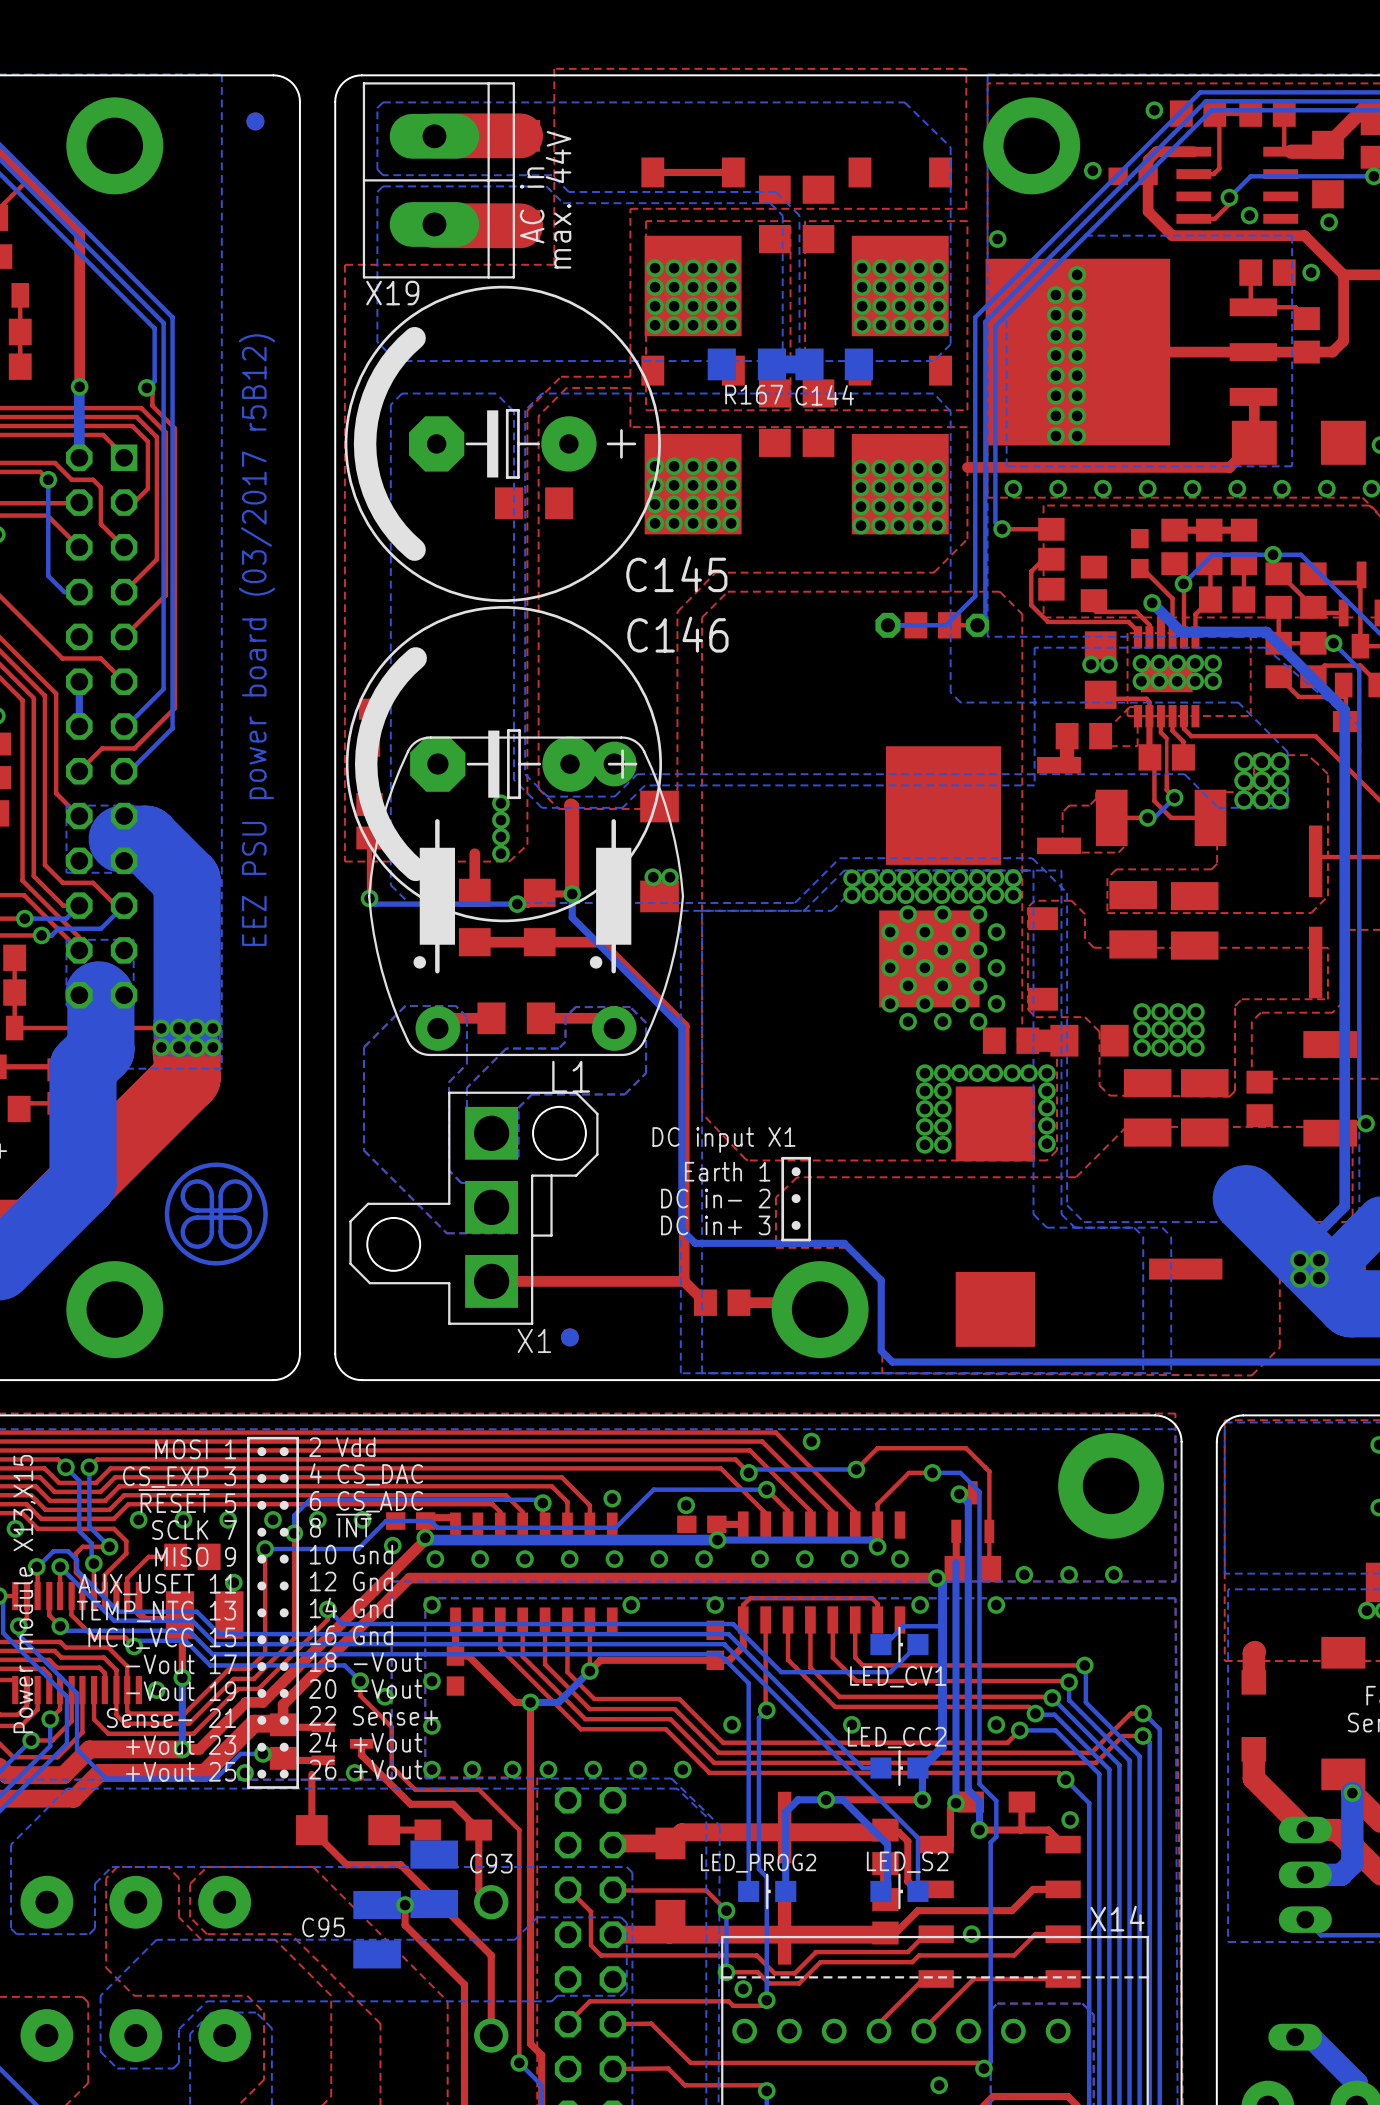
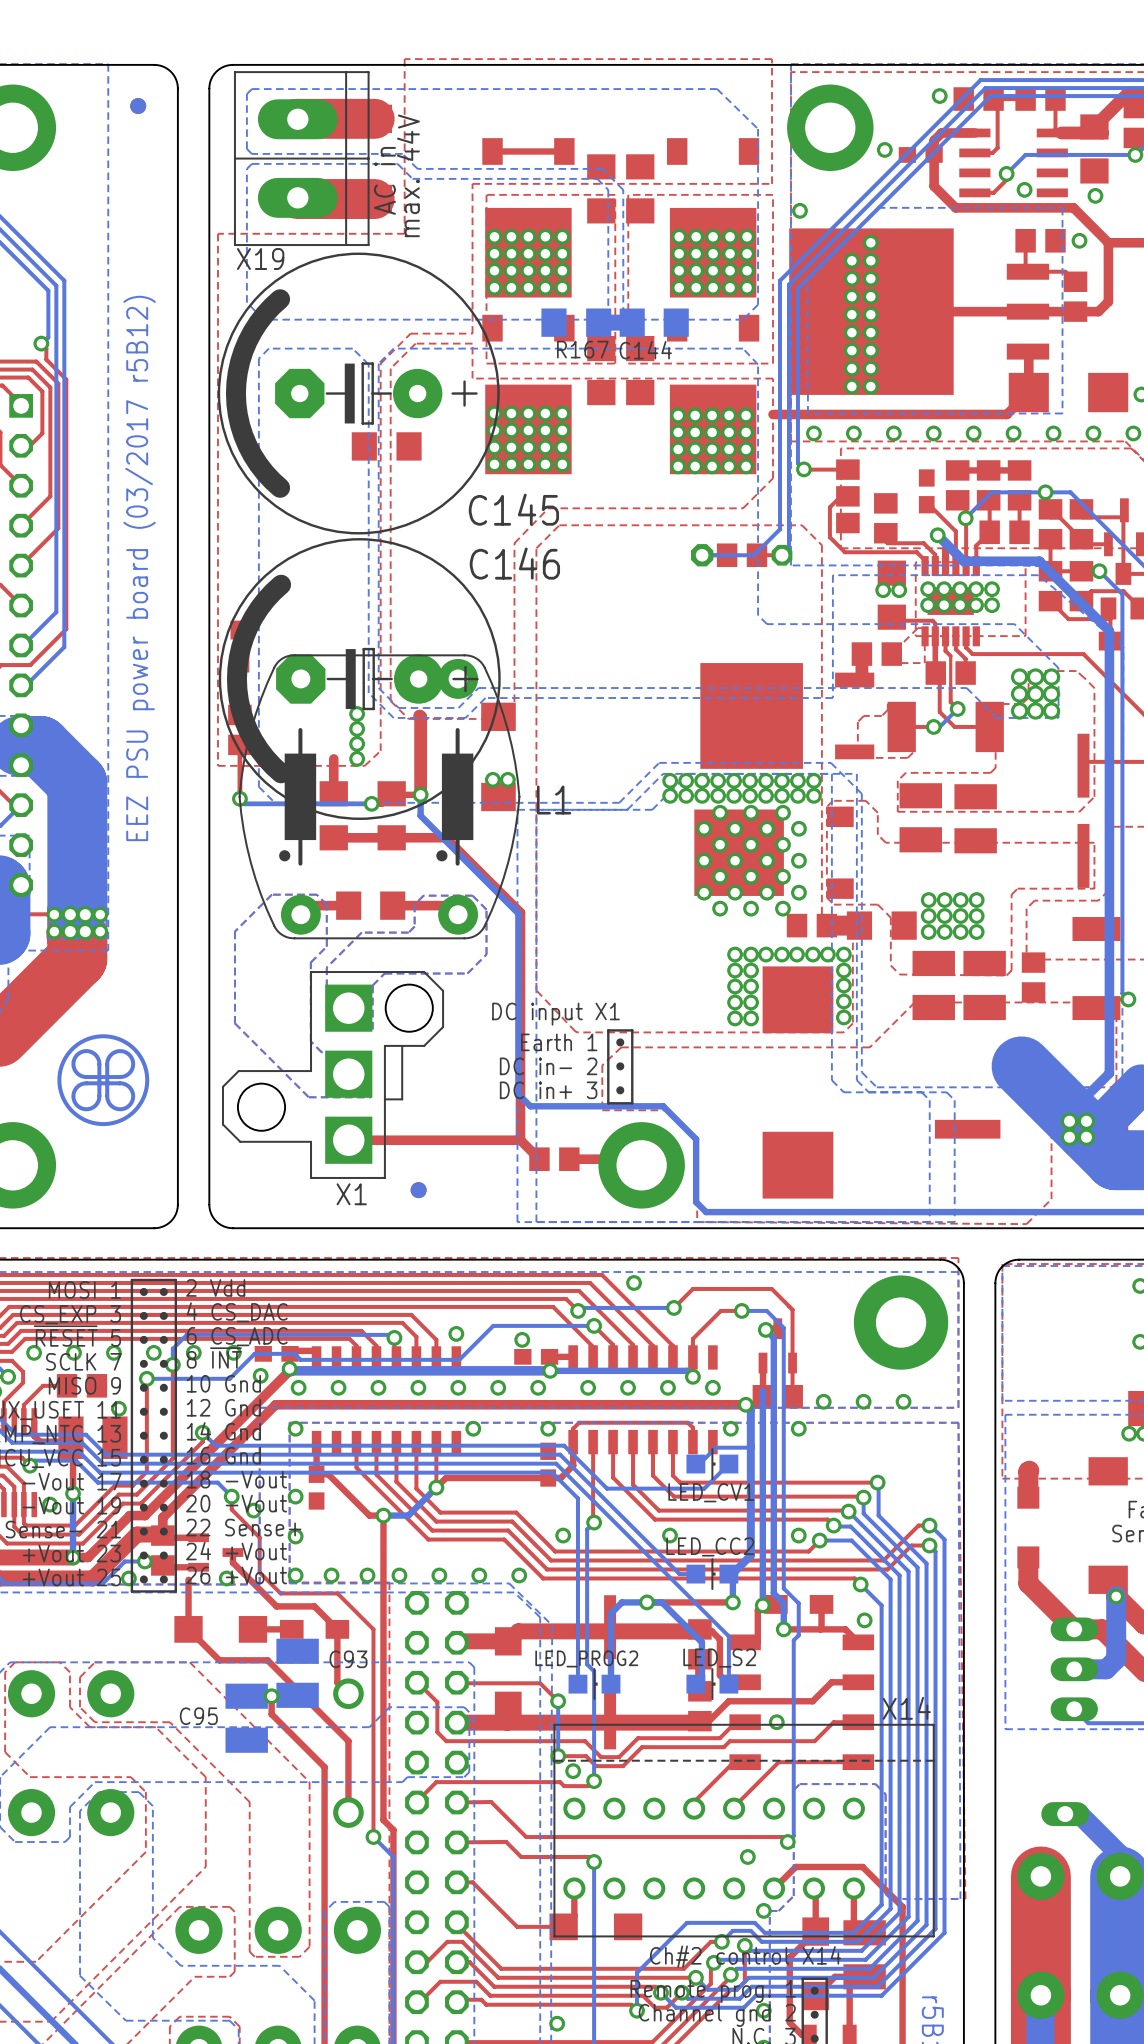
L1 name position: L1 (571, 1076) -> L1 (554, 800)
X1 name position: X1 (534, 1340) -> X1 (351, 1194)

